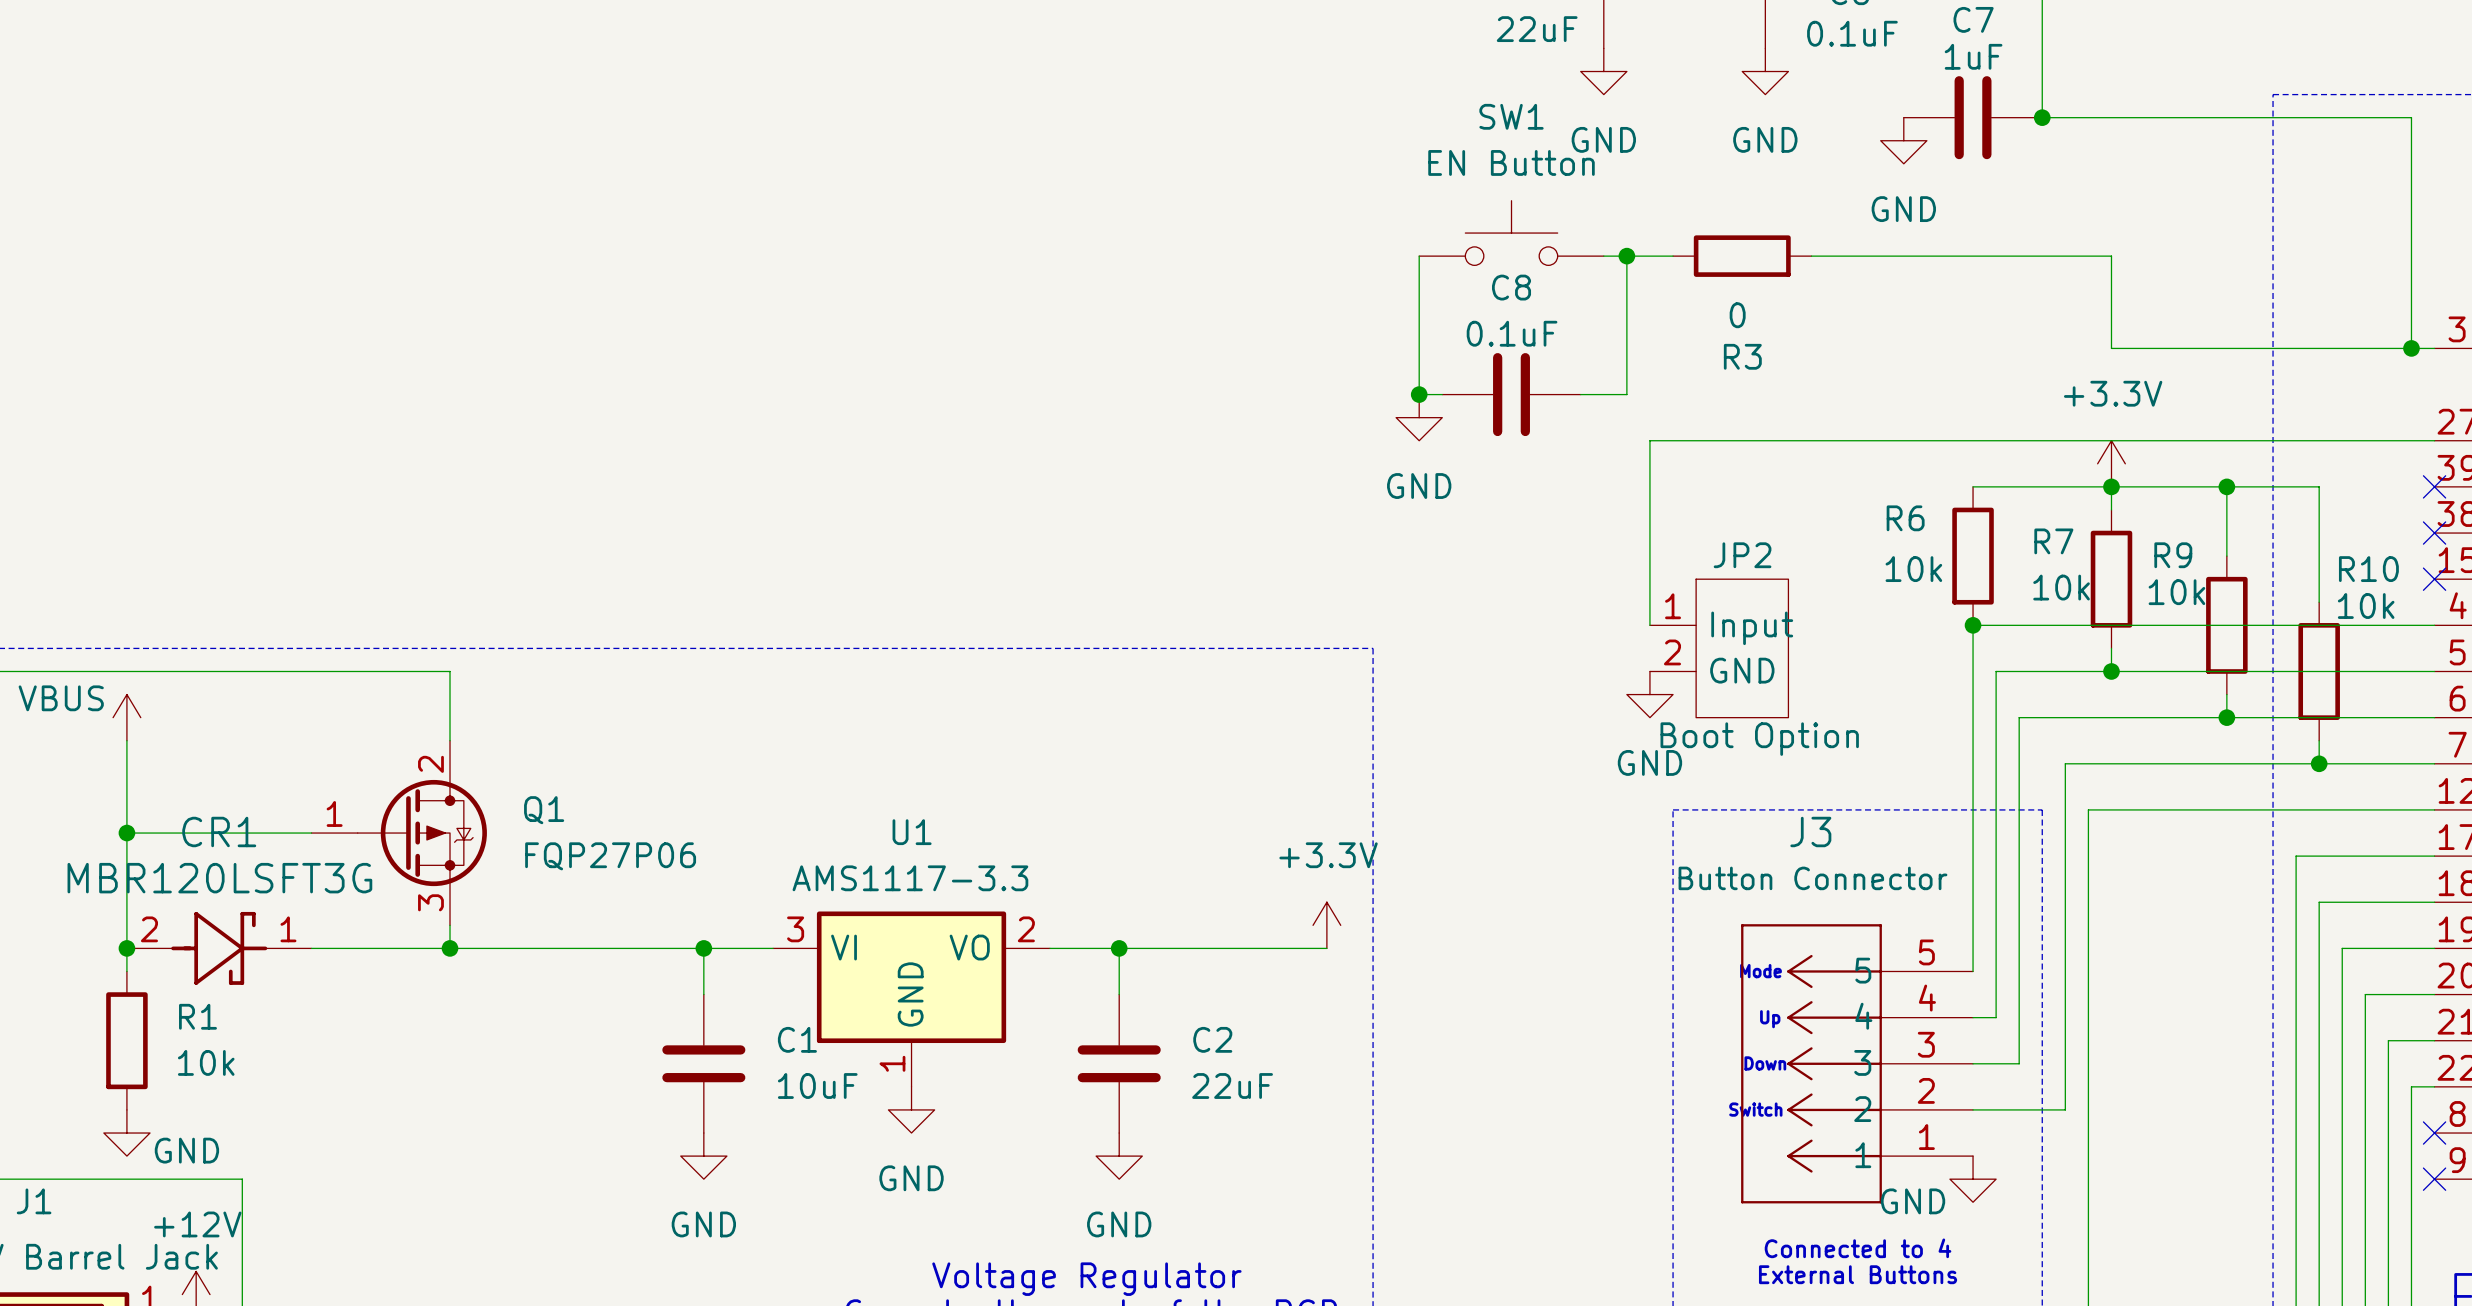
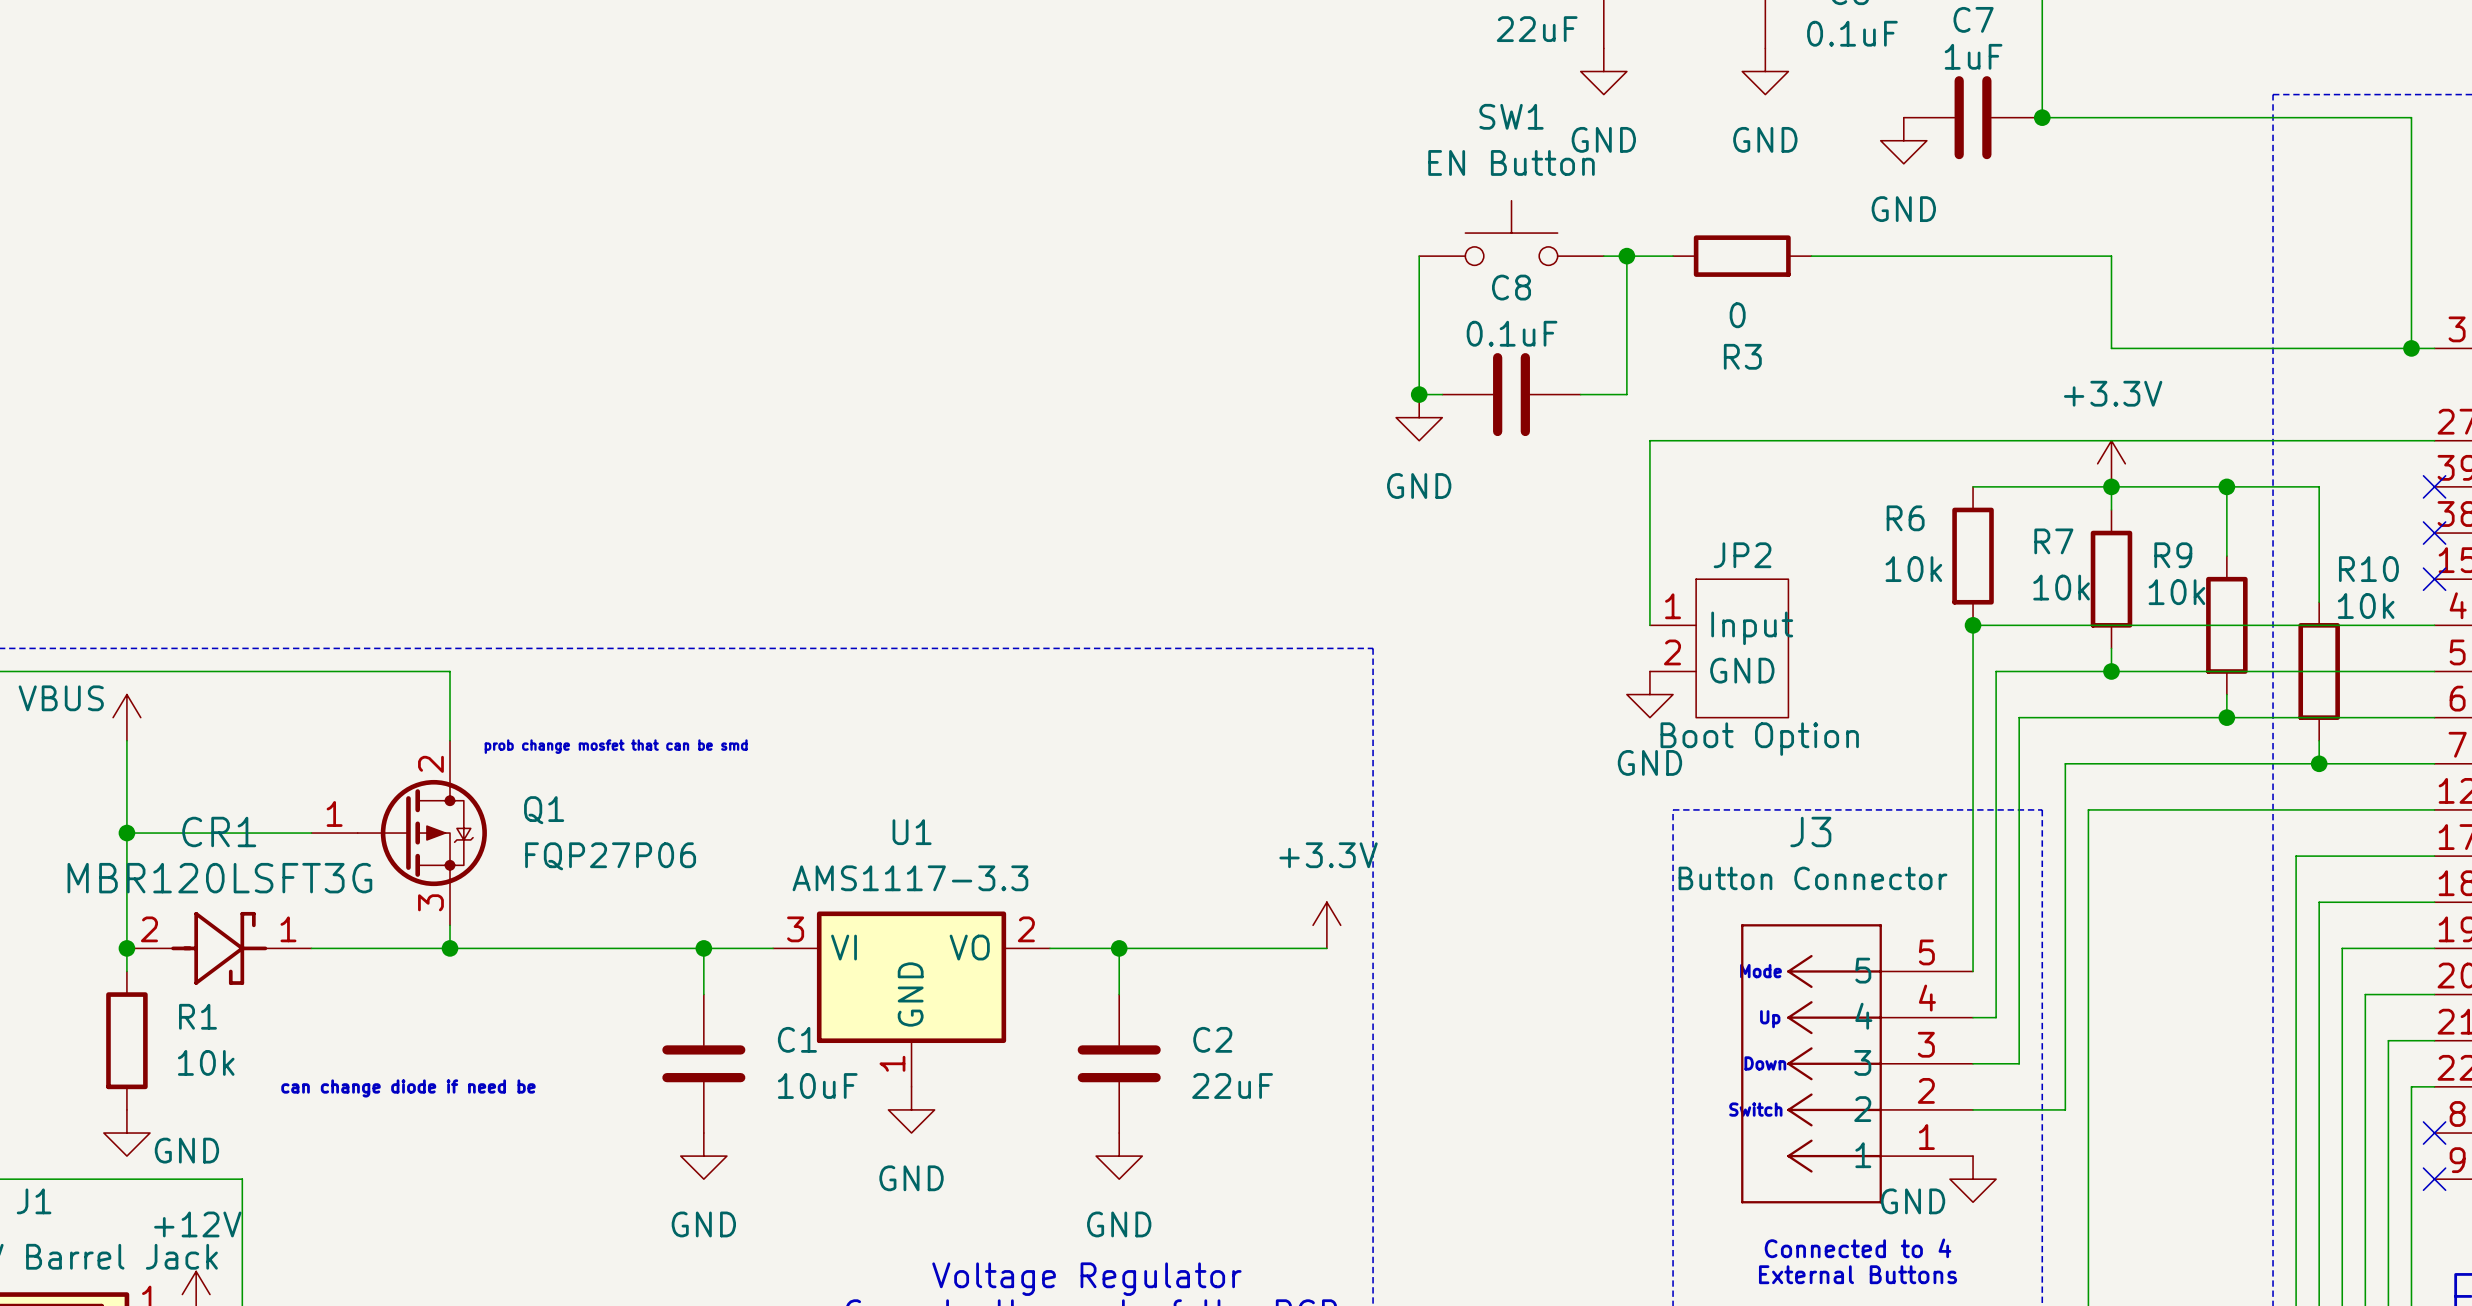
text: none -> prob change mosfet that can be smd (616, 746)
text: none -> can change diode if need be (408, 1088)

